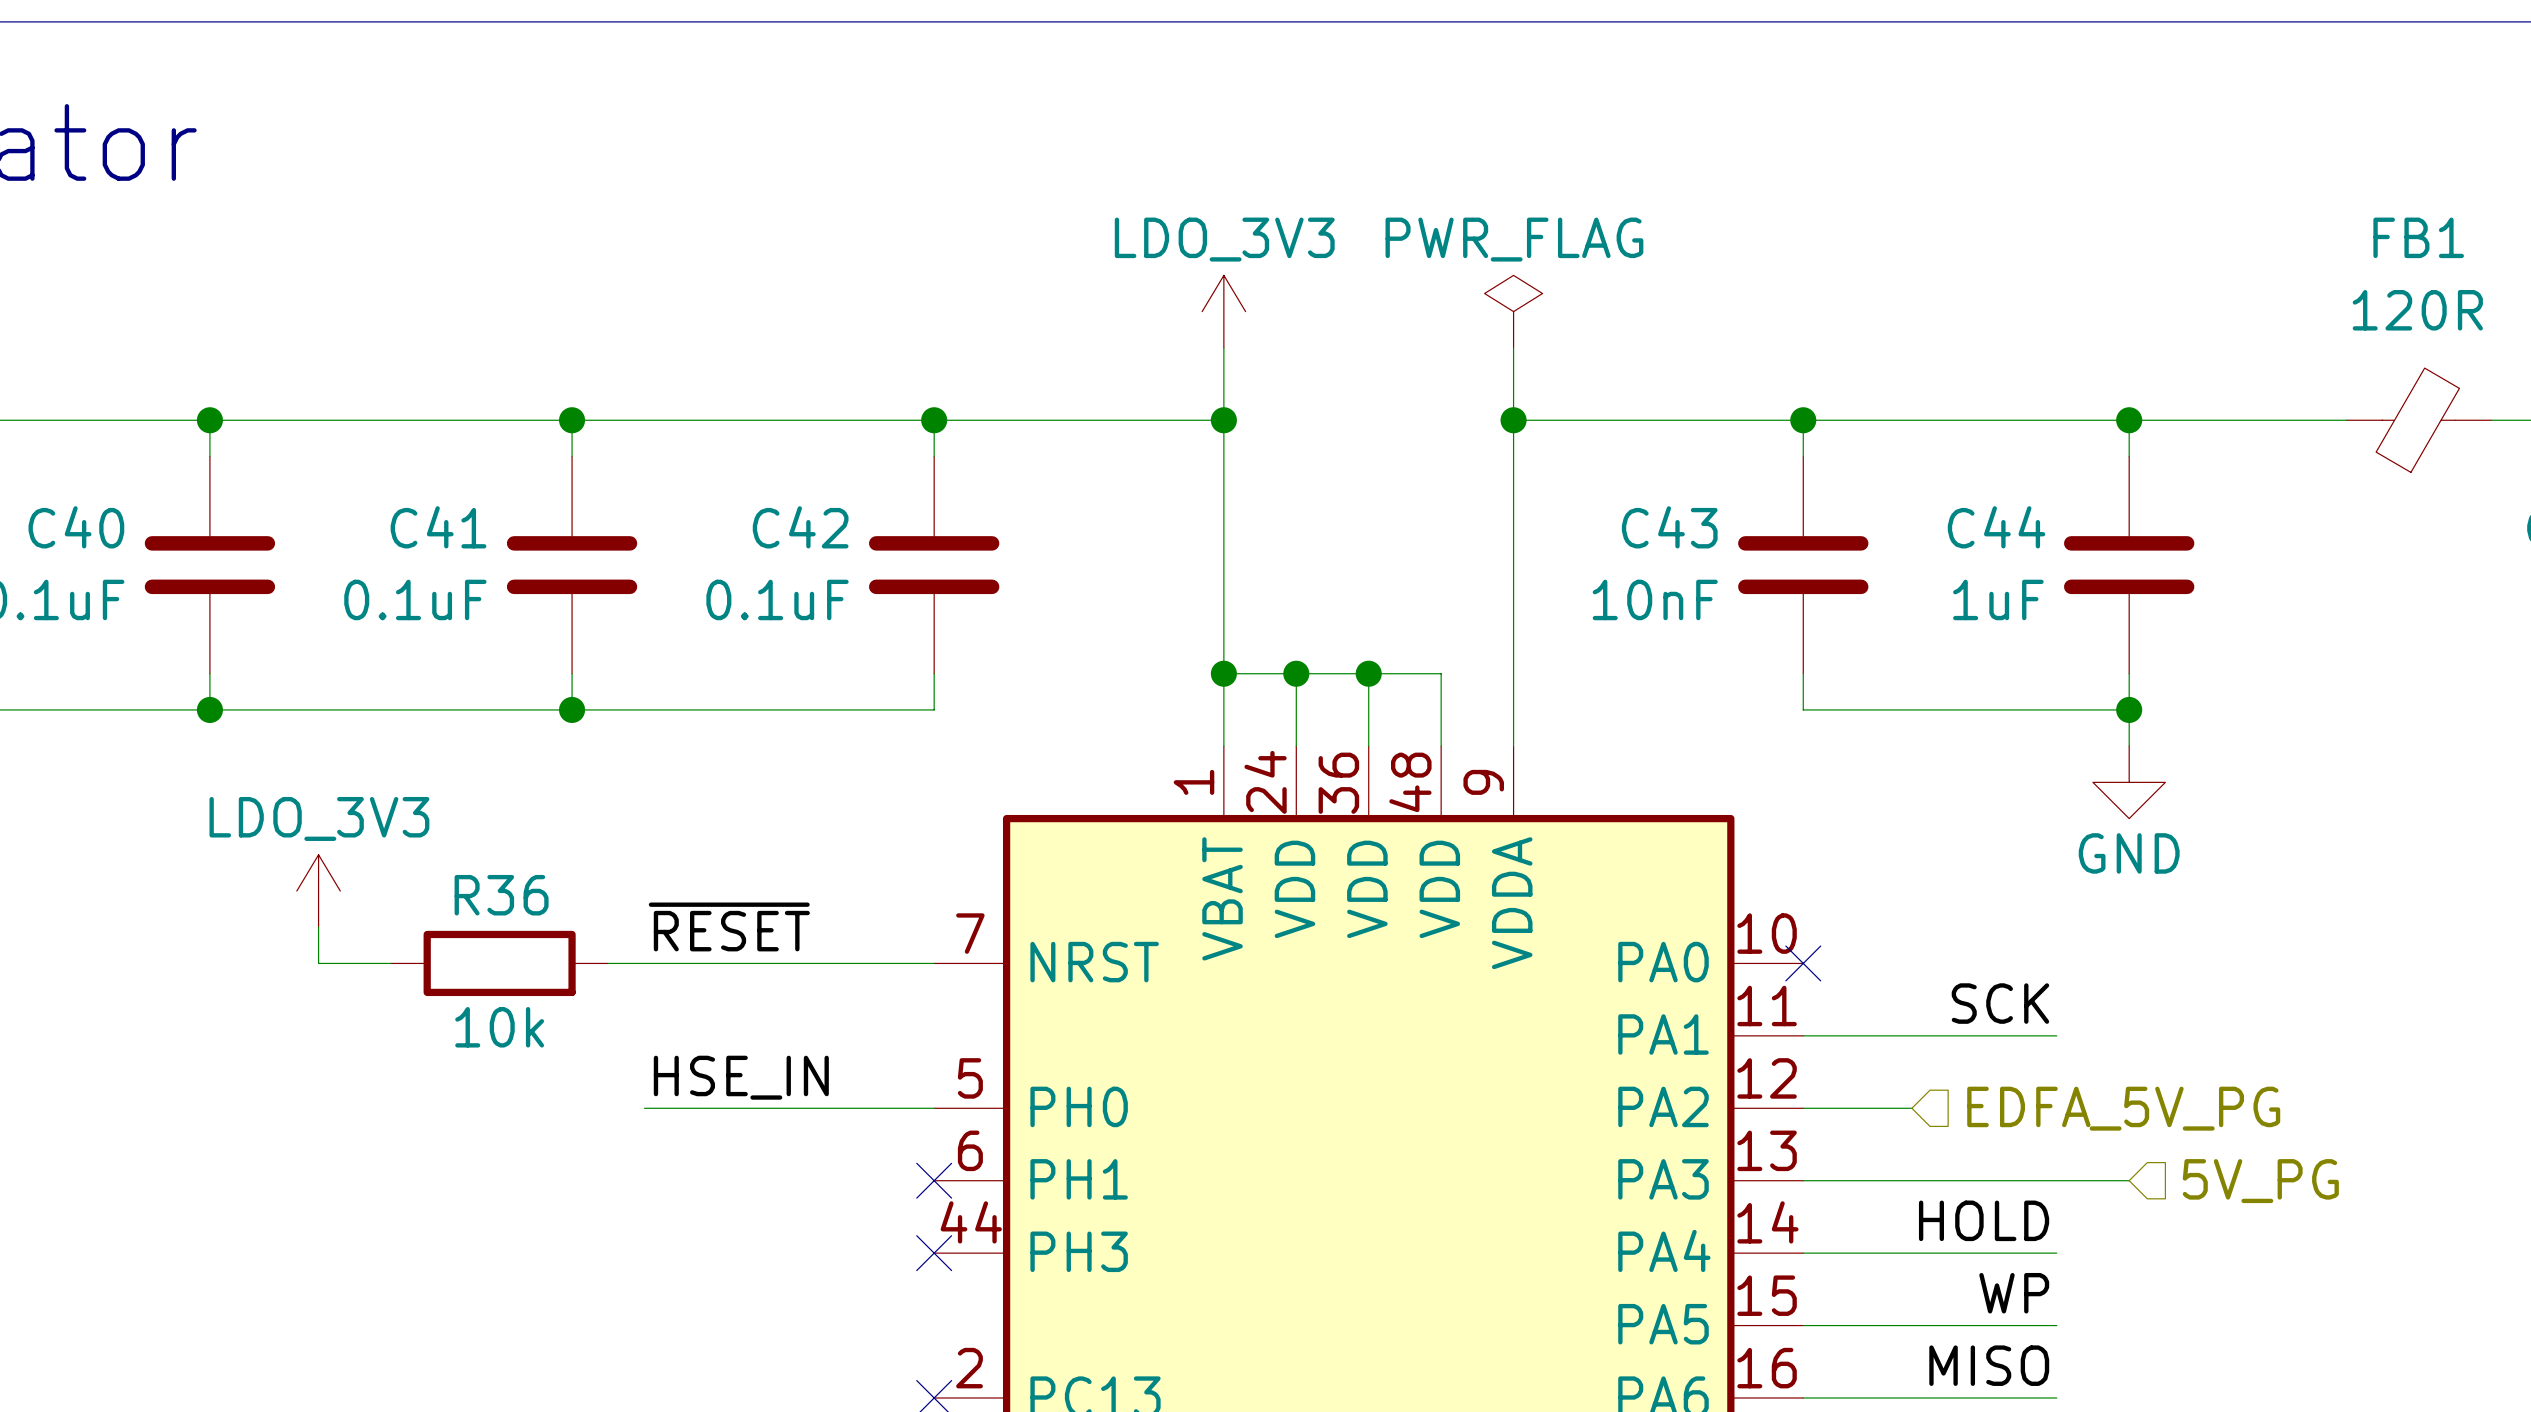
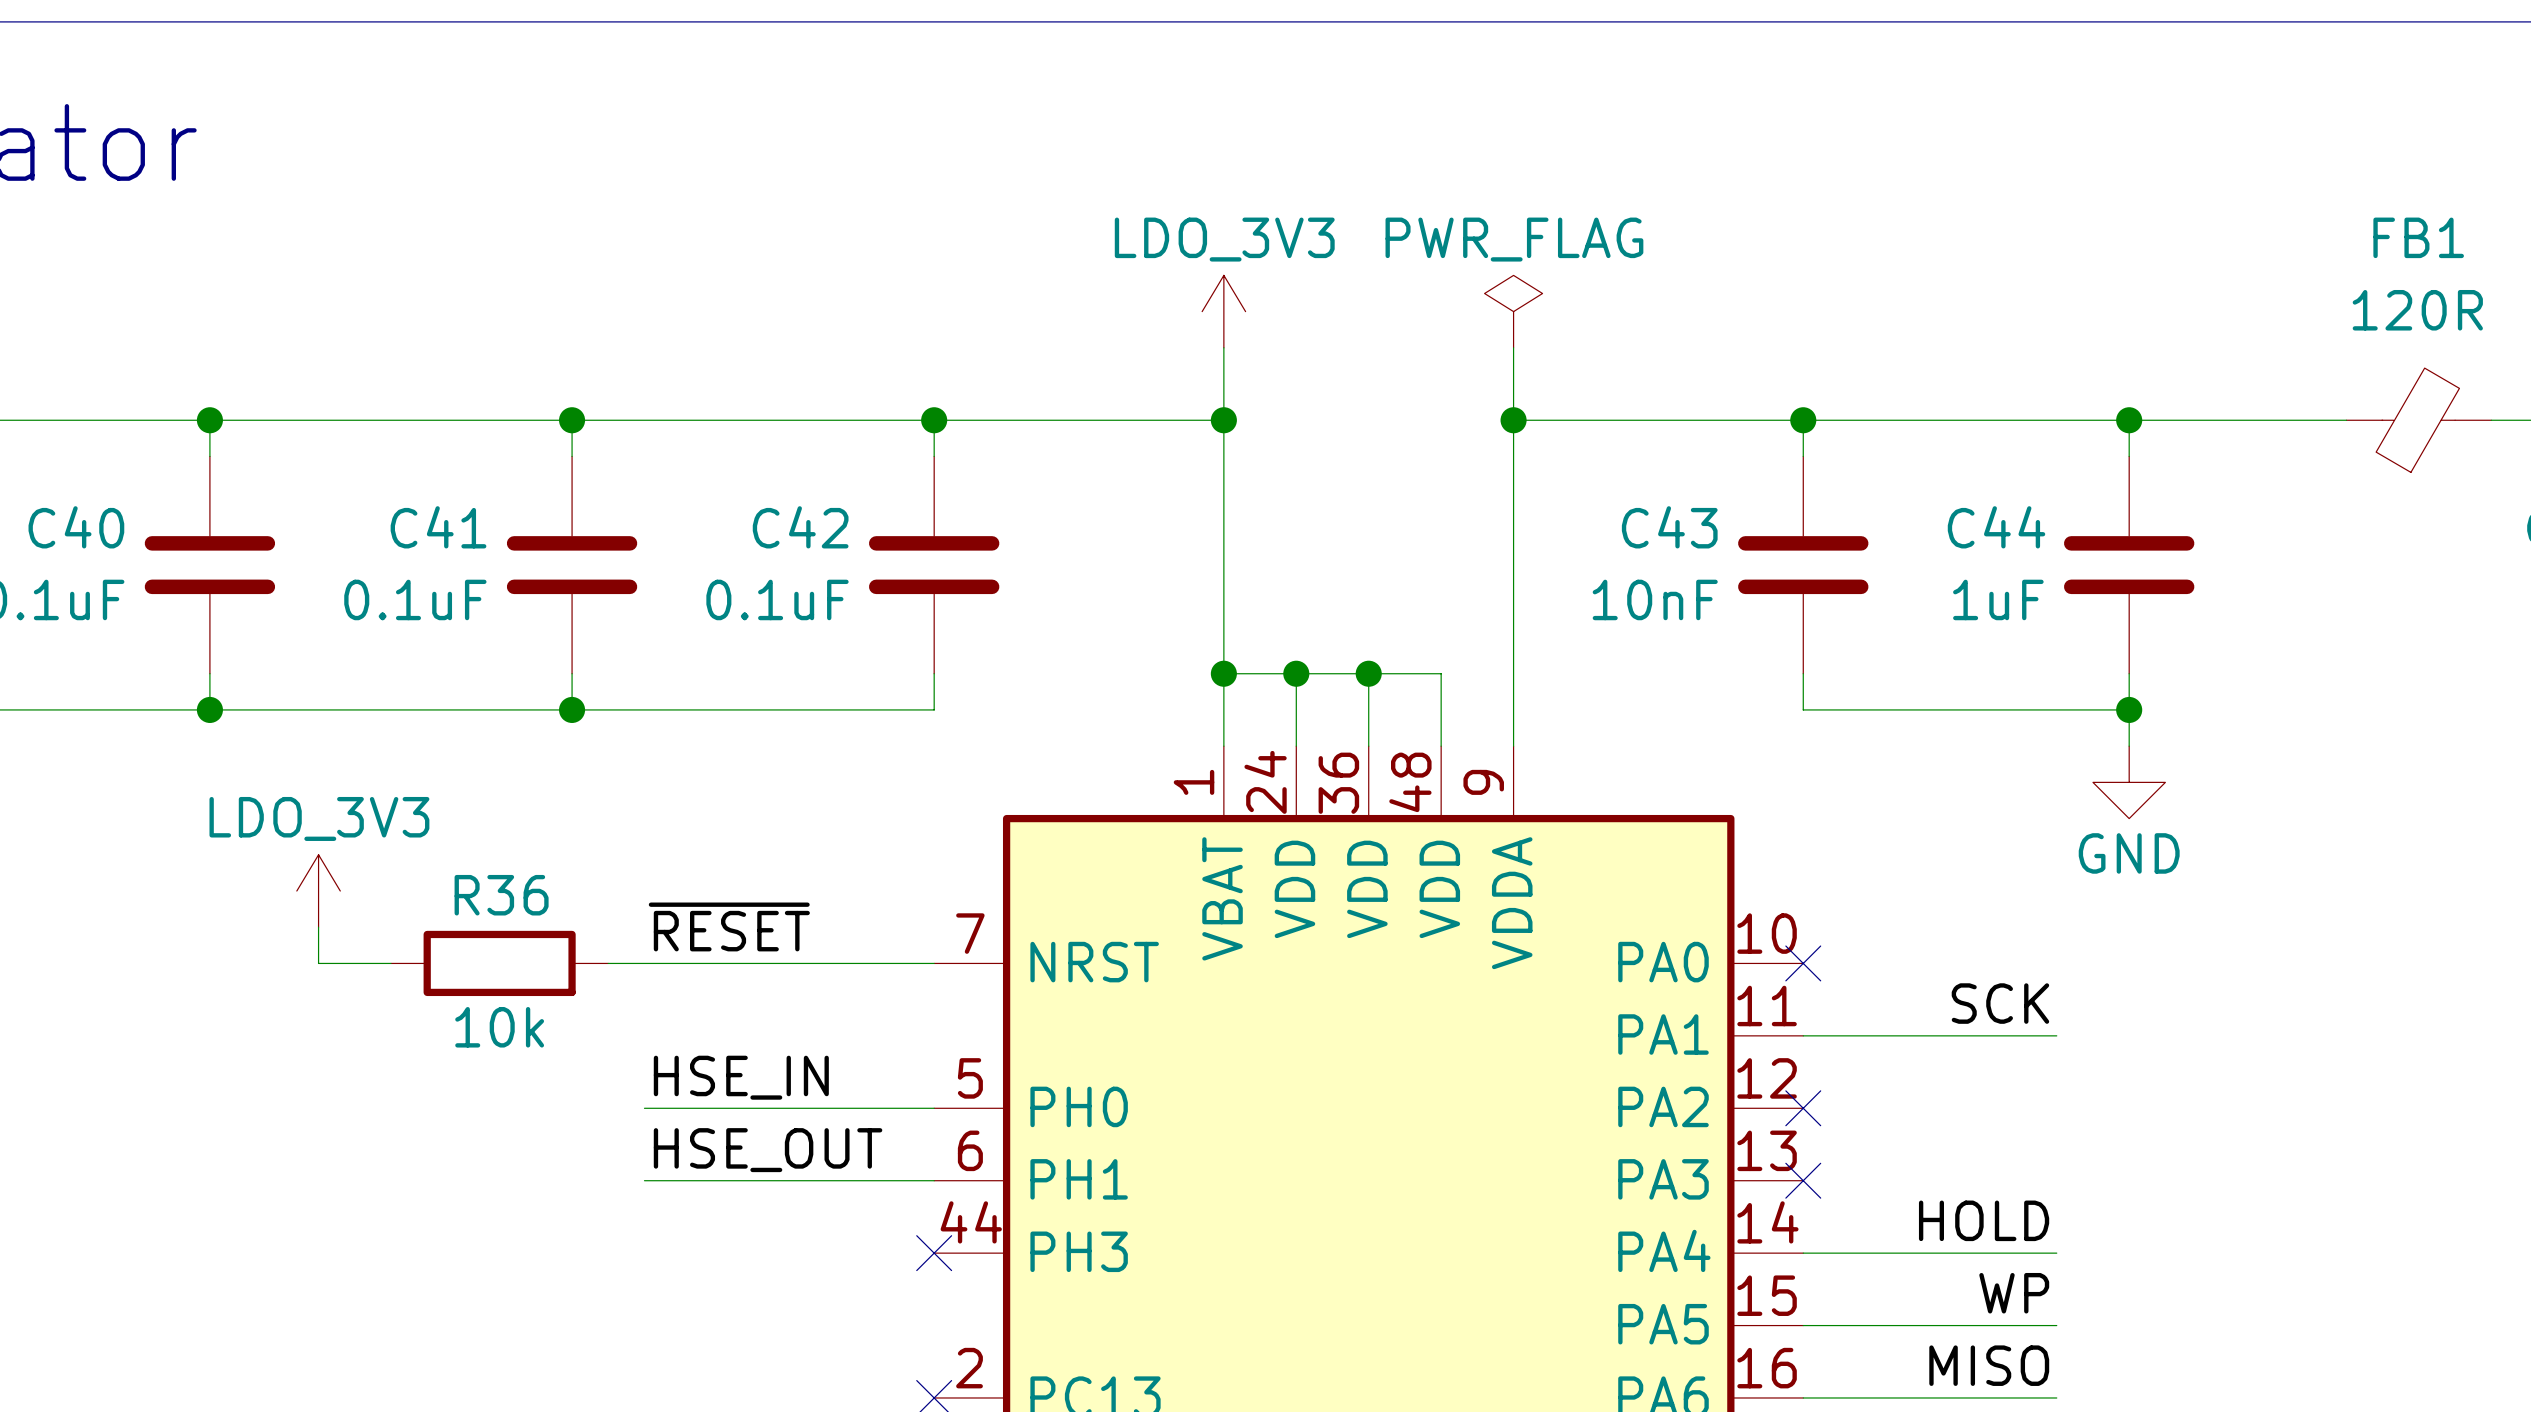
wire: (1803, 1108) (1911, 1108) -> none
no-connect mark: none -> (1803, 1108)
hierarchical label: EDFA_5V_PG (2123, 1108) -> none
label: none -> HSE_OUT (768, 1150)
wire: none -> (644, 1180) (934, 1180)
no-connect mark: (934, 1180) -> none
wire: (1803, 1180) (2129, 1180) -> none
no-connect mark: none -> (1803, 1180)
hierarchical label: 5V_PG (2260, 1181) -> none

